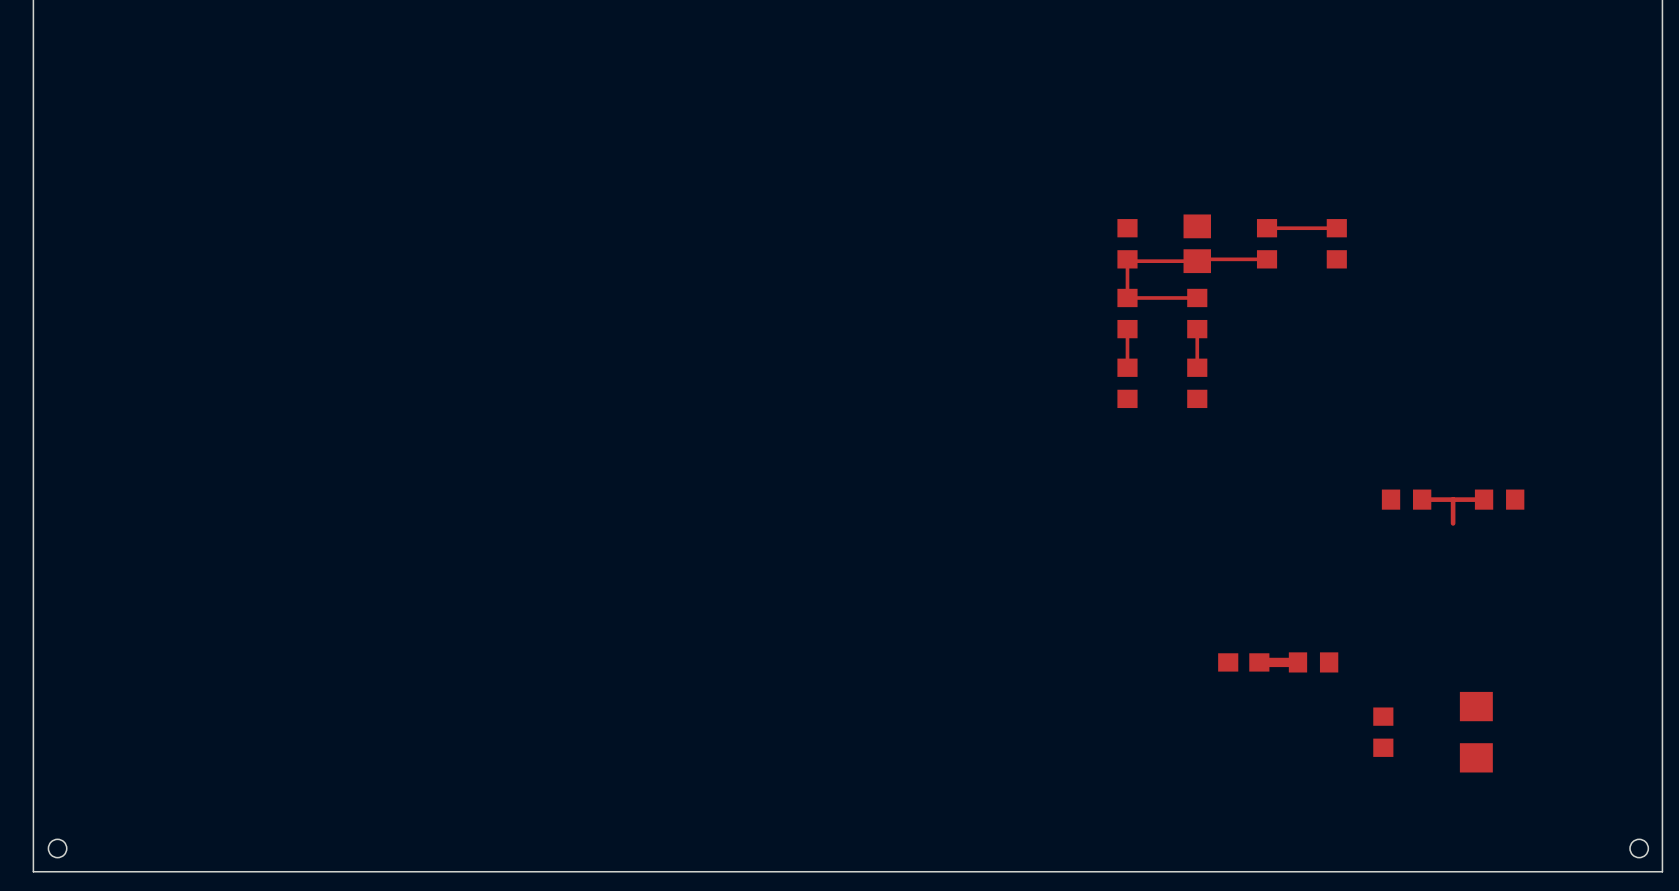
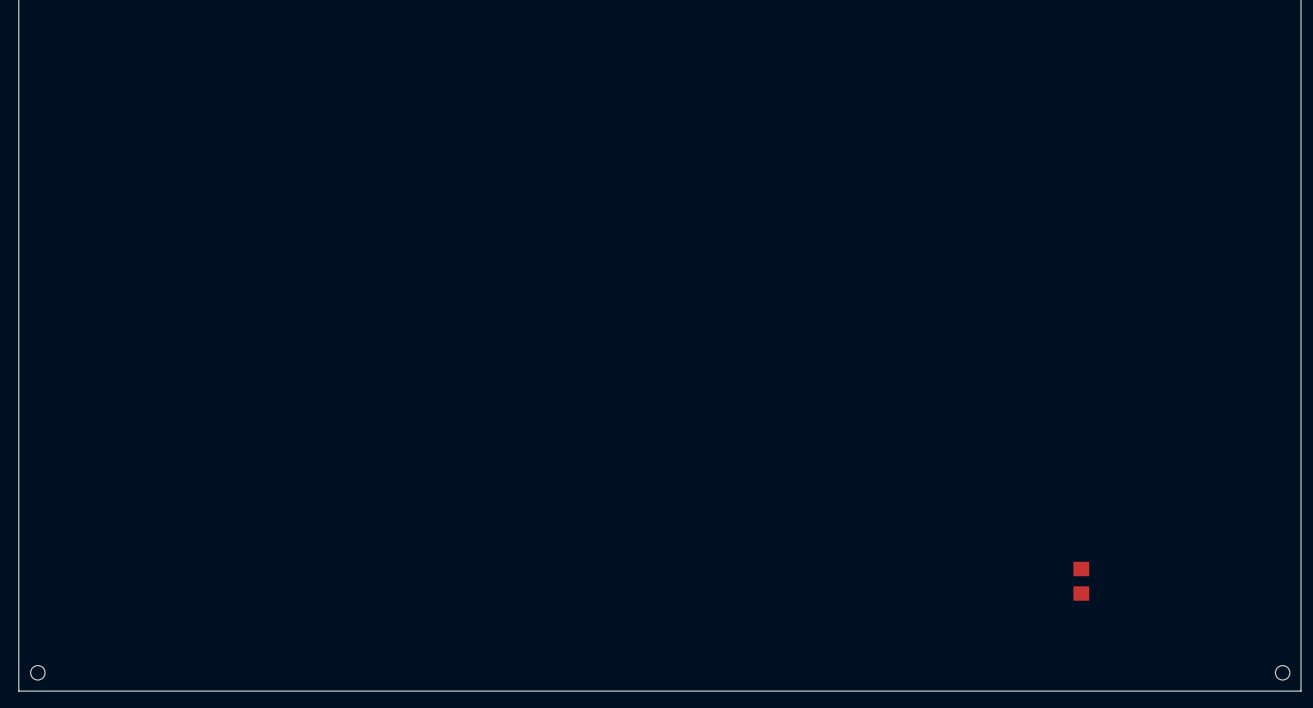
top track: (1336, 228) (1267, 228) -> none
part: (1127, 243) -> none
part: (1197, 243) -> none
part: (1267, 243) -> none
part: (1336, 243) -> none
top track: (1267, 259) (1199, 259) (1197, 261) (1129, 261) (1127, 259) (1127, 297) (1197, 297) -> none
part: (1127, 313) -> none
part: (1197, 313) -> none
top track: (1127, 329) (1127, 367) -> none
top track: (1197, 329) (1197, 367) -> none
part: (1127, 383) -> none
part: (1197, 383) -> none
part: (1406, 499) -> none
top track: (1453, 499) (1453, 523) -> none
top track: (1484, 499) (1422, 499) -> none
part: (1499, 499) -> none
part: (1243, 662) -> none
top track: (1297, 662) (1259, 662) -> none
part: (1313, 662) -> none
part: (1476, 732) -> none

